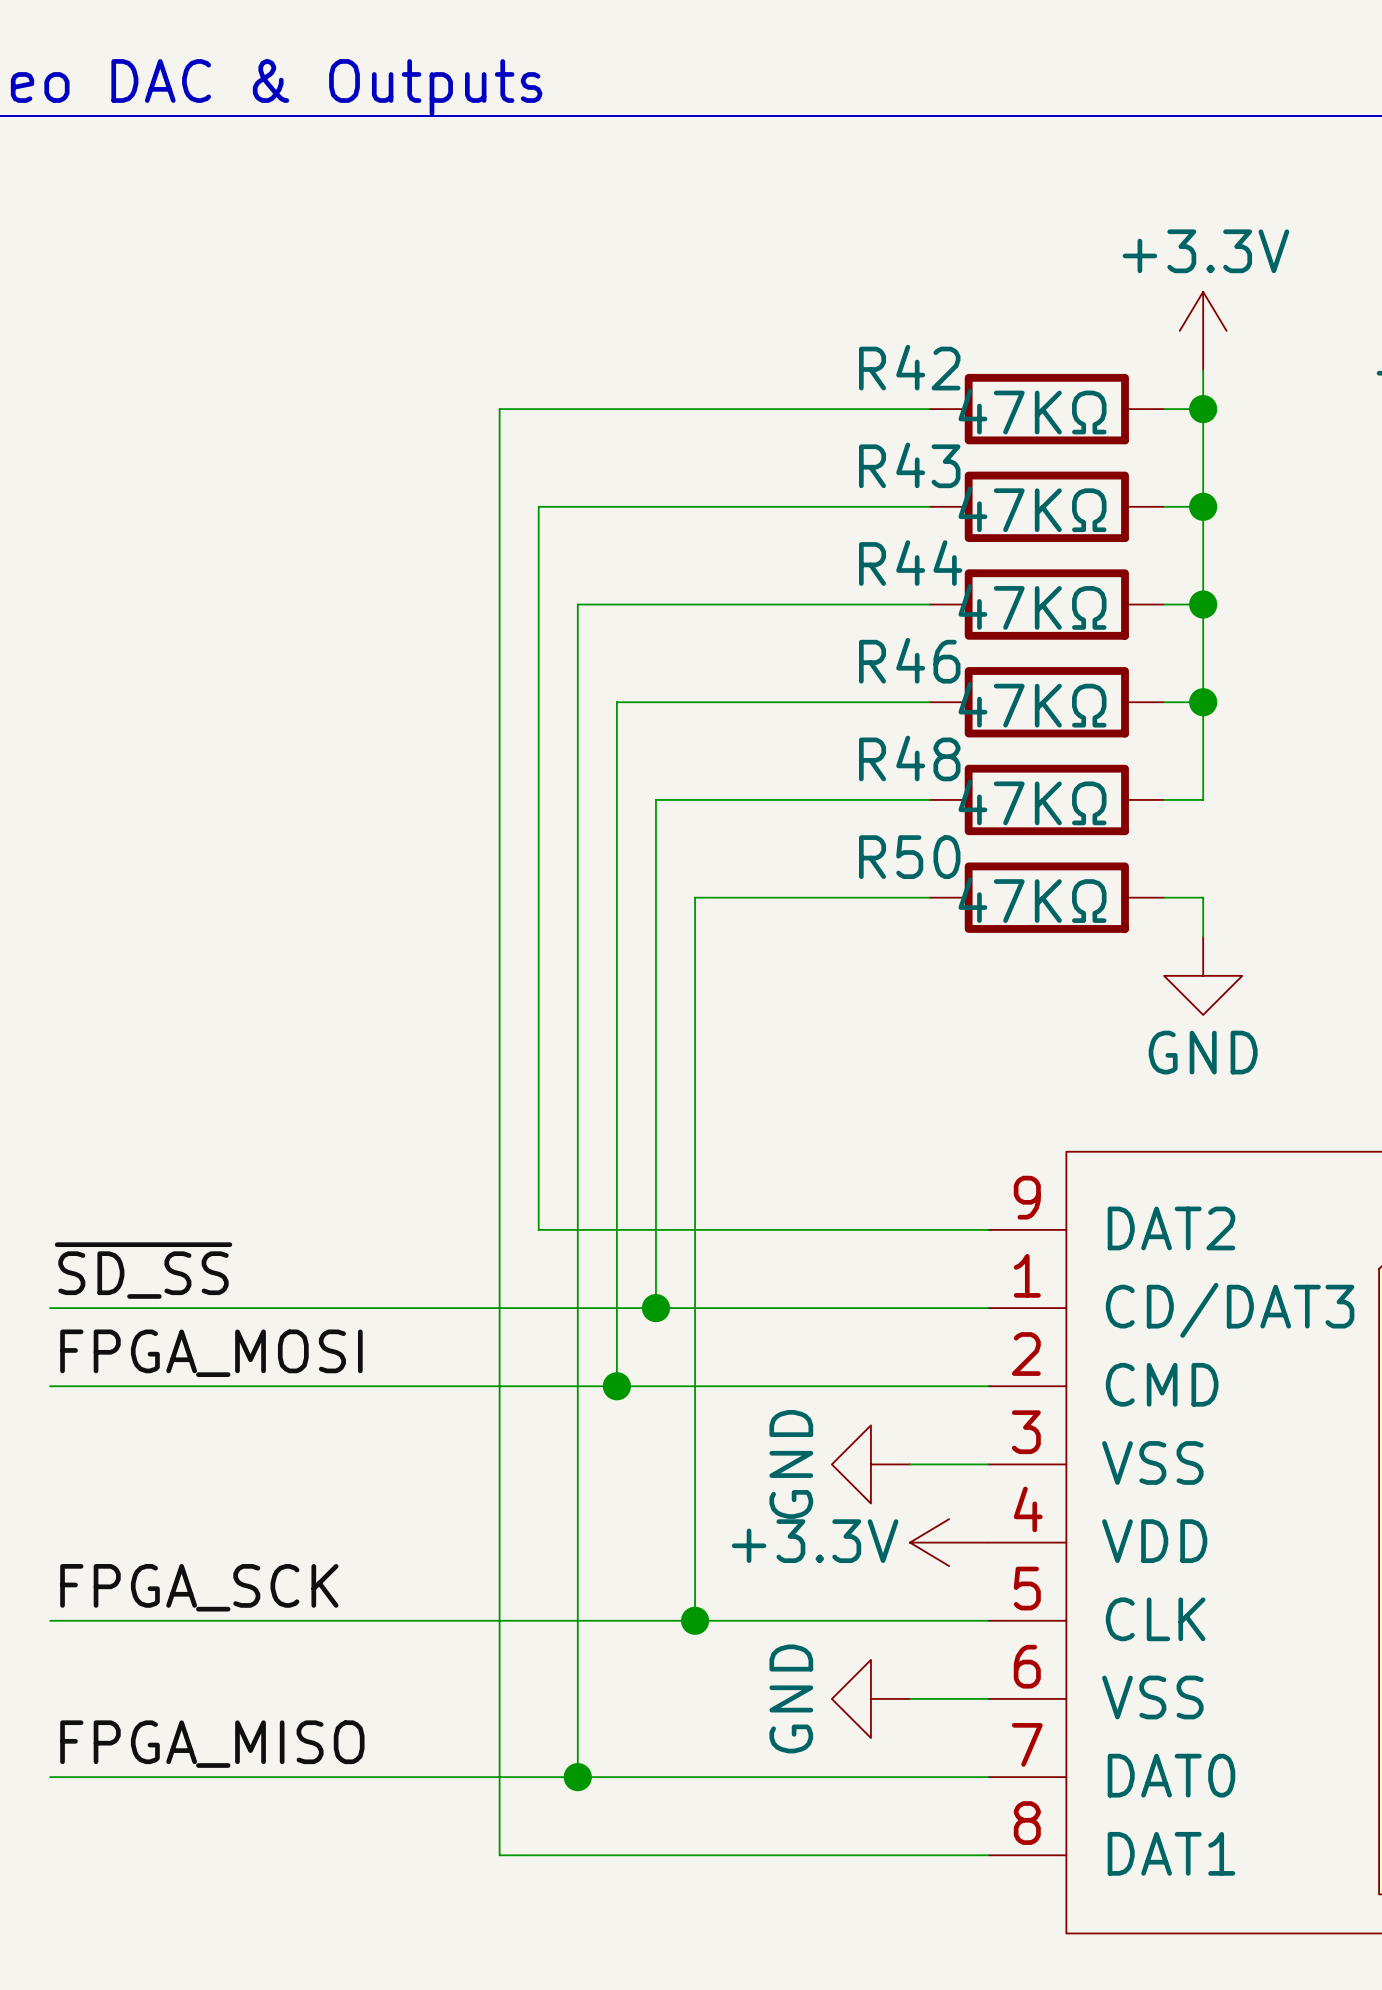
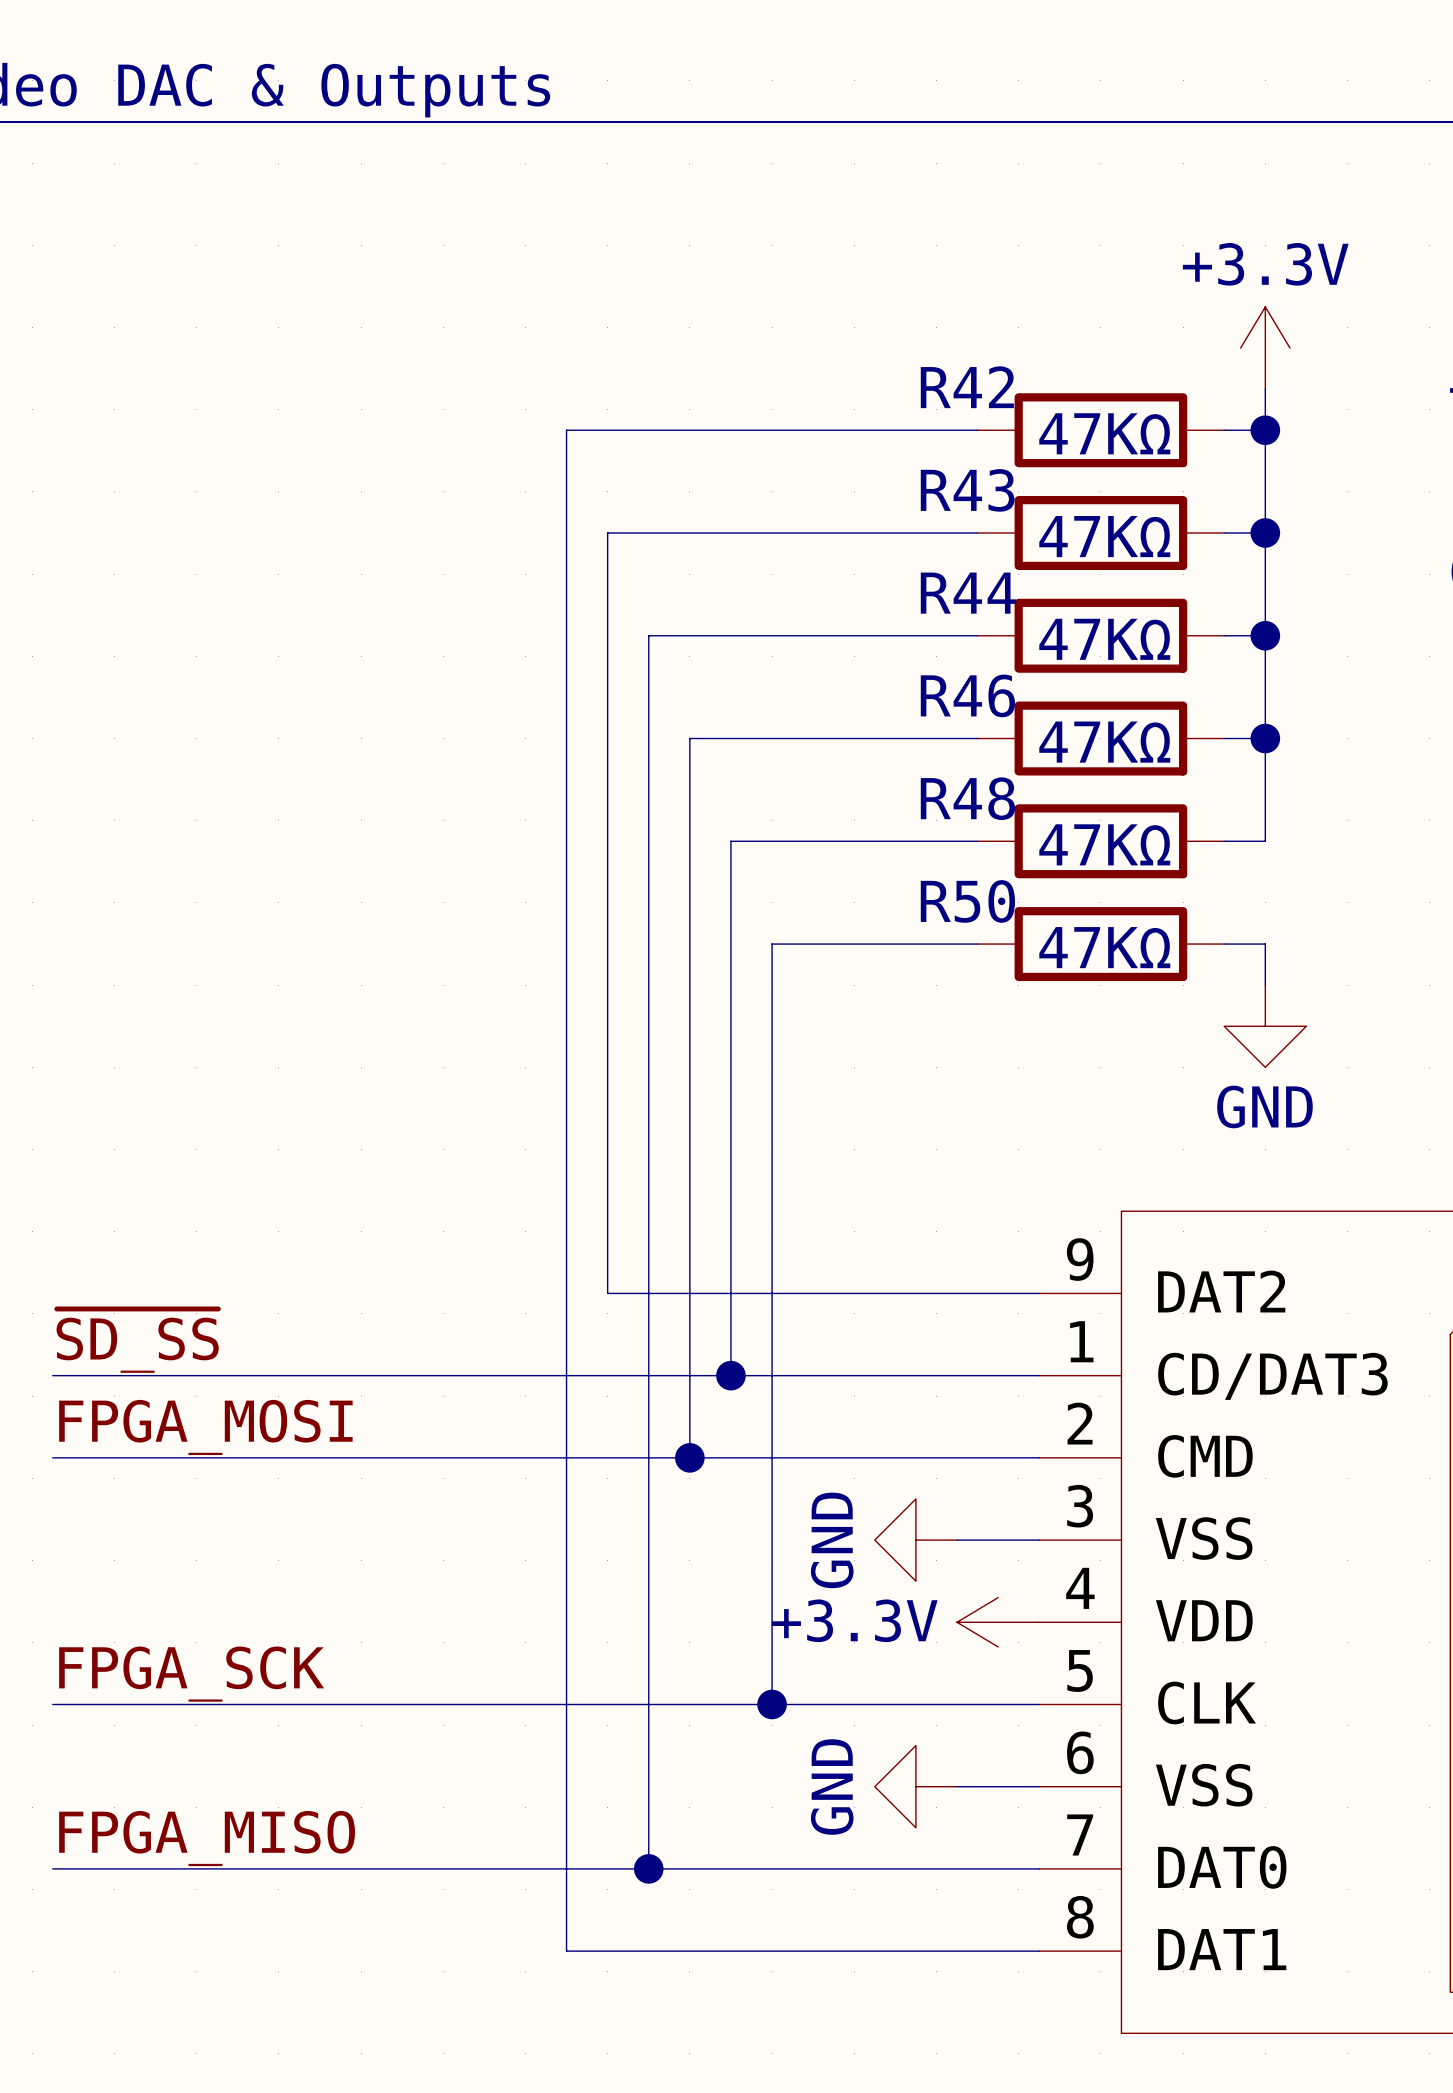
wire: (538, 409) (499, 409) (499, 1855) (538, 1855) -> none
wire: (538, 506) (577, 506) -> (566, 532) (566, 430)
wire: none -> (607, 532) (607, 635)
wire: (577, 604) (616, 604) -> (648, 738) (648, 635)
wire: (616, 702) (655, 702) -> (689, 841) (689, 738)
wire: (655, 799) (695, 799) -> none
wire: (695, 897) (734, 897) -> (730, 944) (730, 841)
wire: none -> (772, 944) (772, 1704)
wire: (538, 1229) (577, 1229) (577, 1777) -> (566, 1293) (566, 1951)
wire: none -> (689, 1375) (689, 1457)
junction: (655, 1308) -> none
wire: (695, 1308) (695, 1620) -> none
junction: none -> (730, 1375)
wire: none -> (648, 1457) (648, 1868)
junction: (616, 1386) -> none
junction: none -> (689, 1457)
junction position: (695, 1620) -> (772, 1704)
junction position: (577, 1777) -> (648, 1868)

